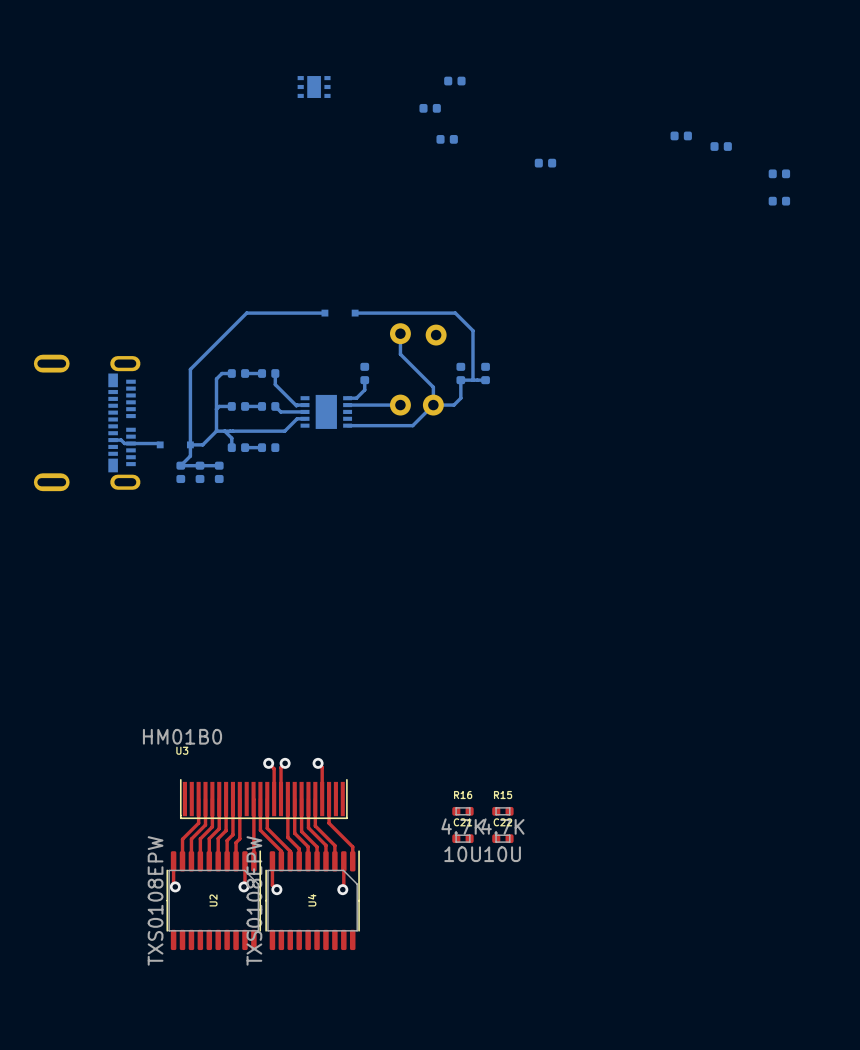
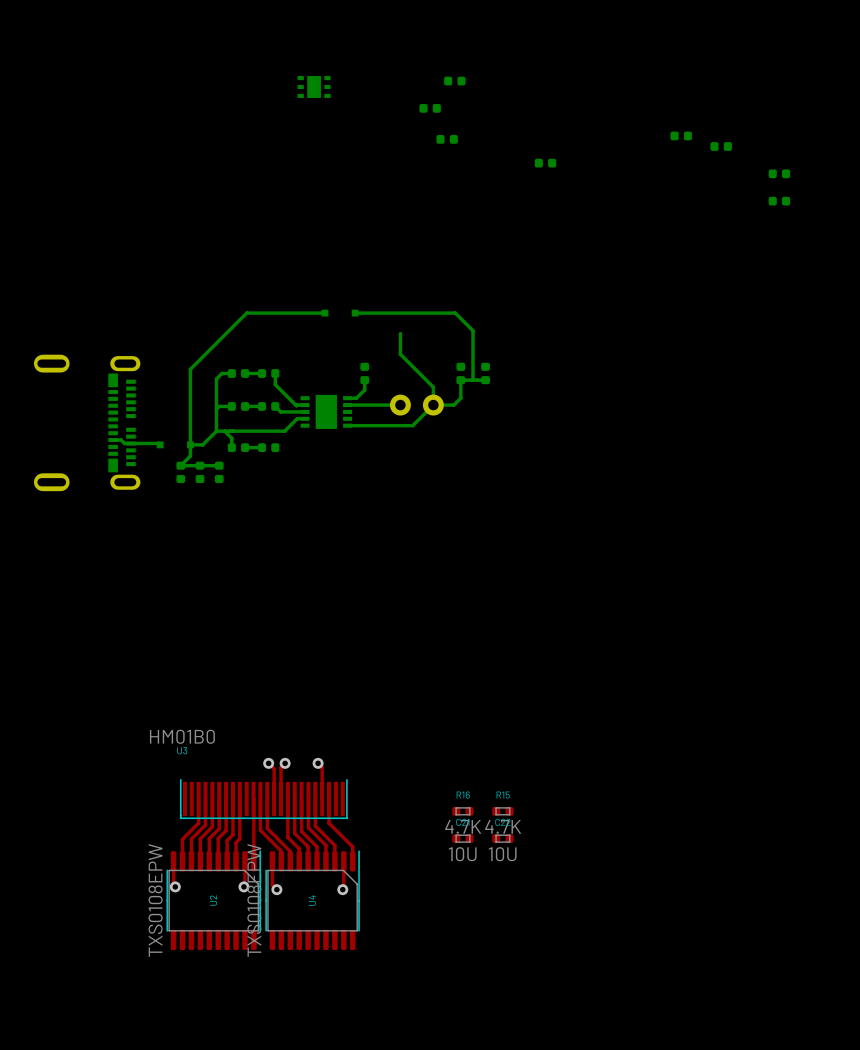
part: (400, 333) -> none
part: (436, 335) -> none

